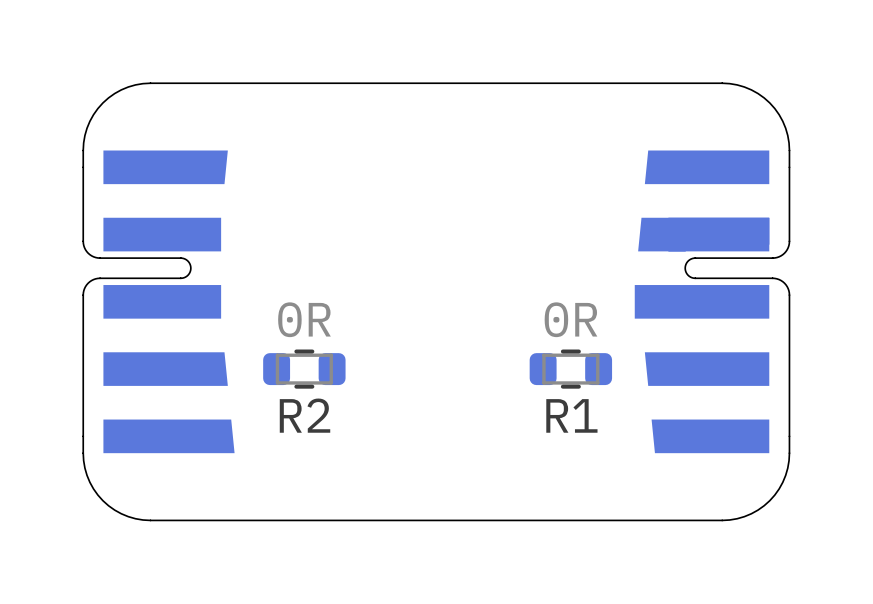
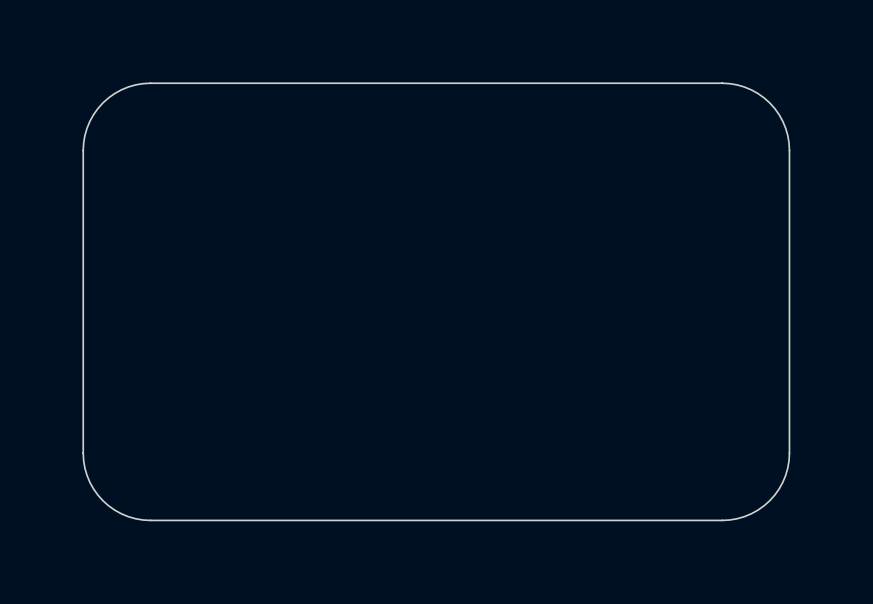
board edge: none -> (83, 167) (83, 436)
board edge: none -> (789, 167) (789, 436)
part: (158, 301) -> none
part: (712, 301) -> none
R2: 0R (304, 369) -> none
R1: 0R (570, 369) -> none

